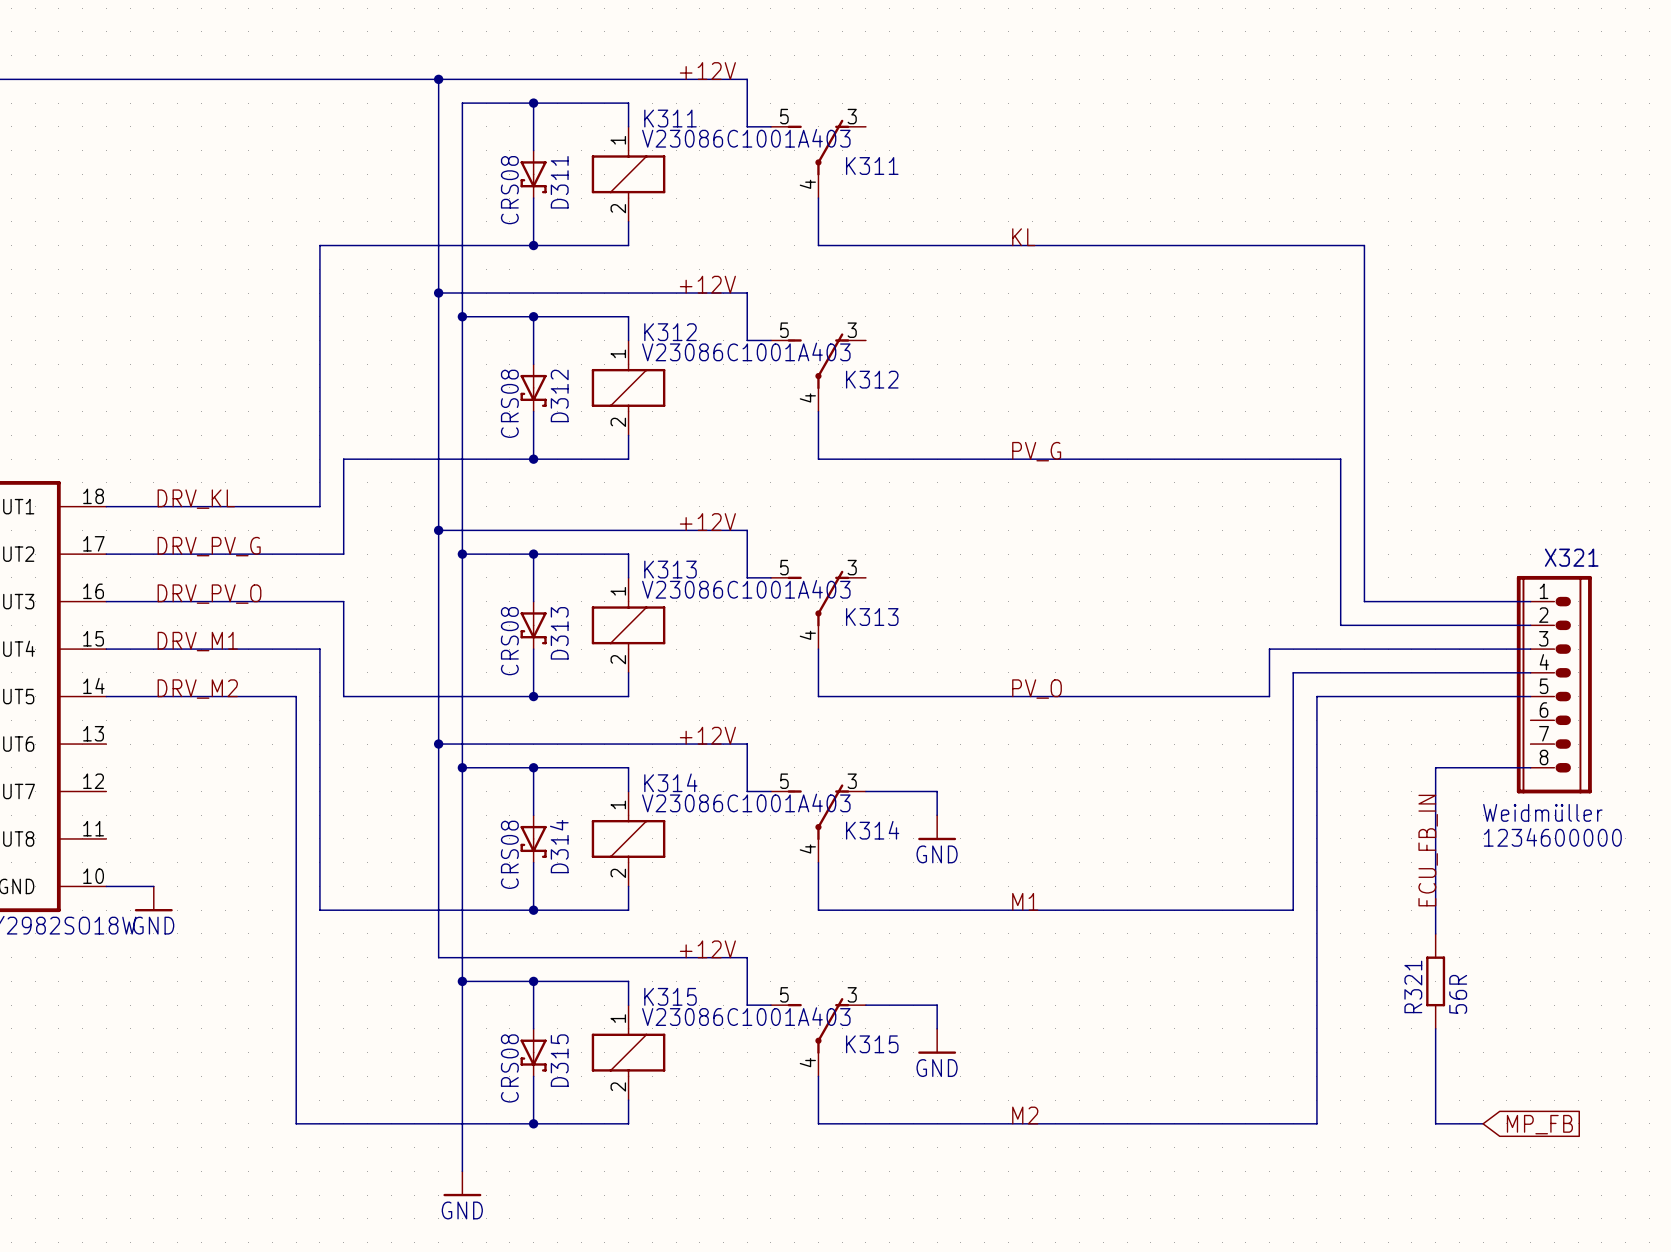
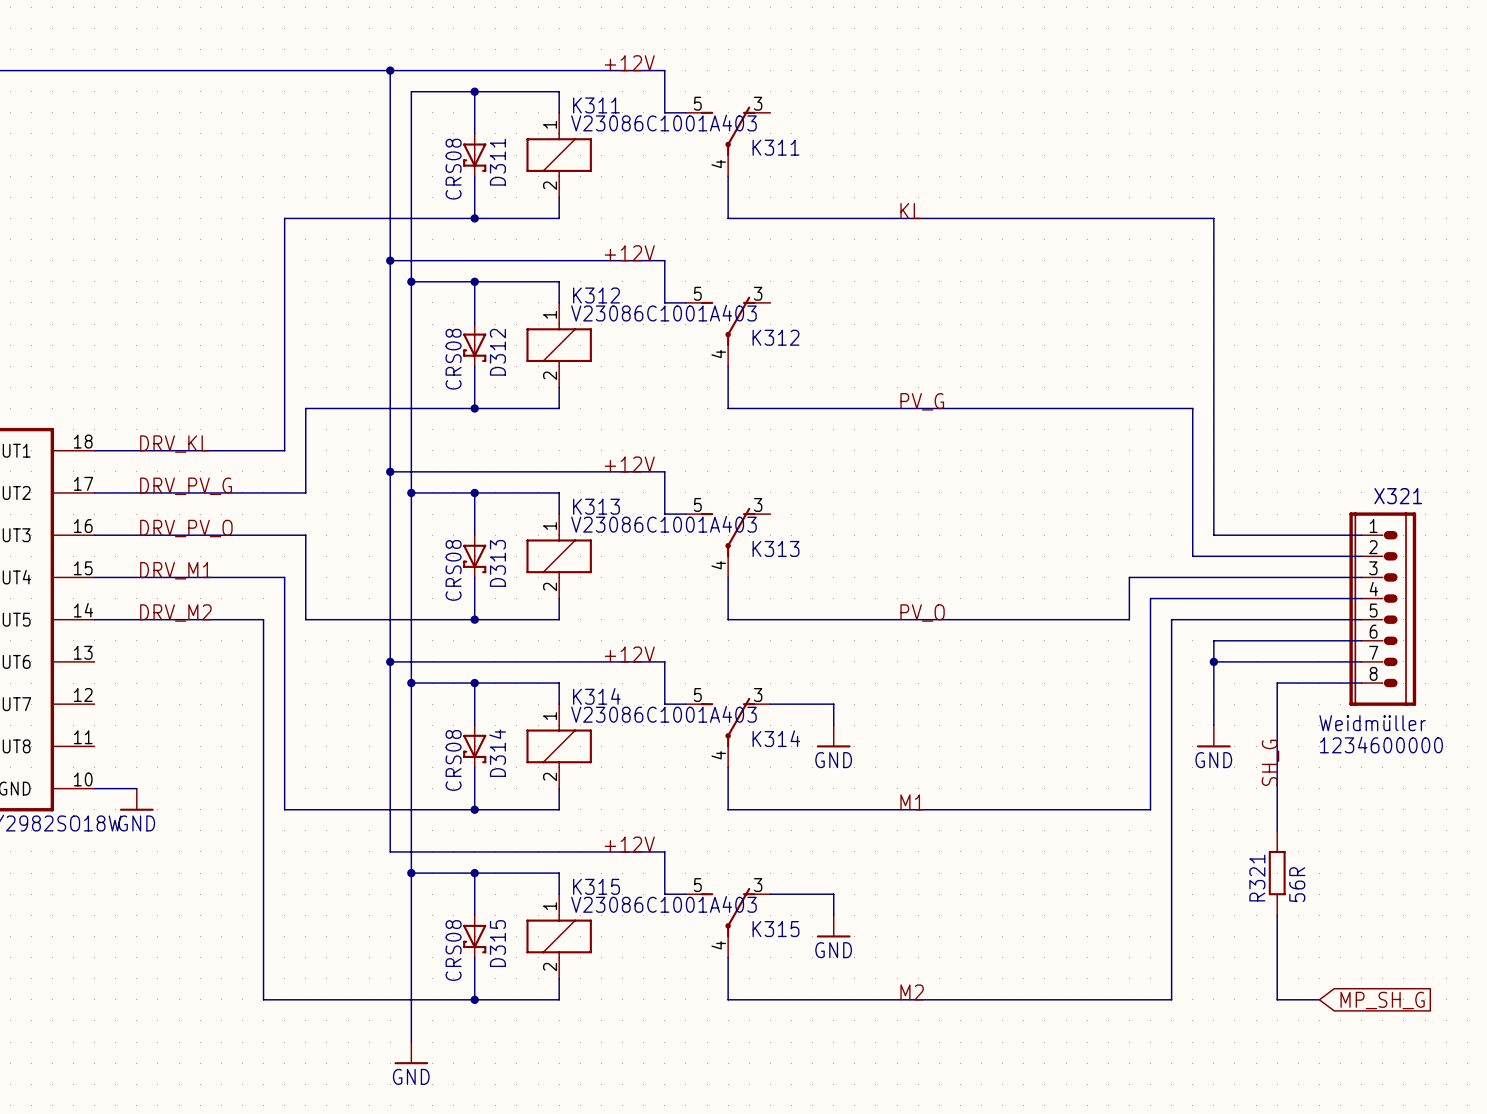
wire: none -> (1361, 640) (1213, 640) (1213, 725)
wire: none -> (1213, 661) (1361, 661)
junction: none -> (1213, 661)
power symbol: none -> GND (1213, 736)
label: ECU_FB_IN (1428, 850) -> none
label: none -> SH_G (1270, 762)
global label: MP_FB (1539, 1124) -> MP_SH_G (1382, 1000)

